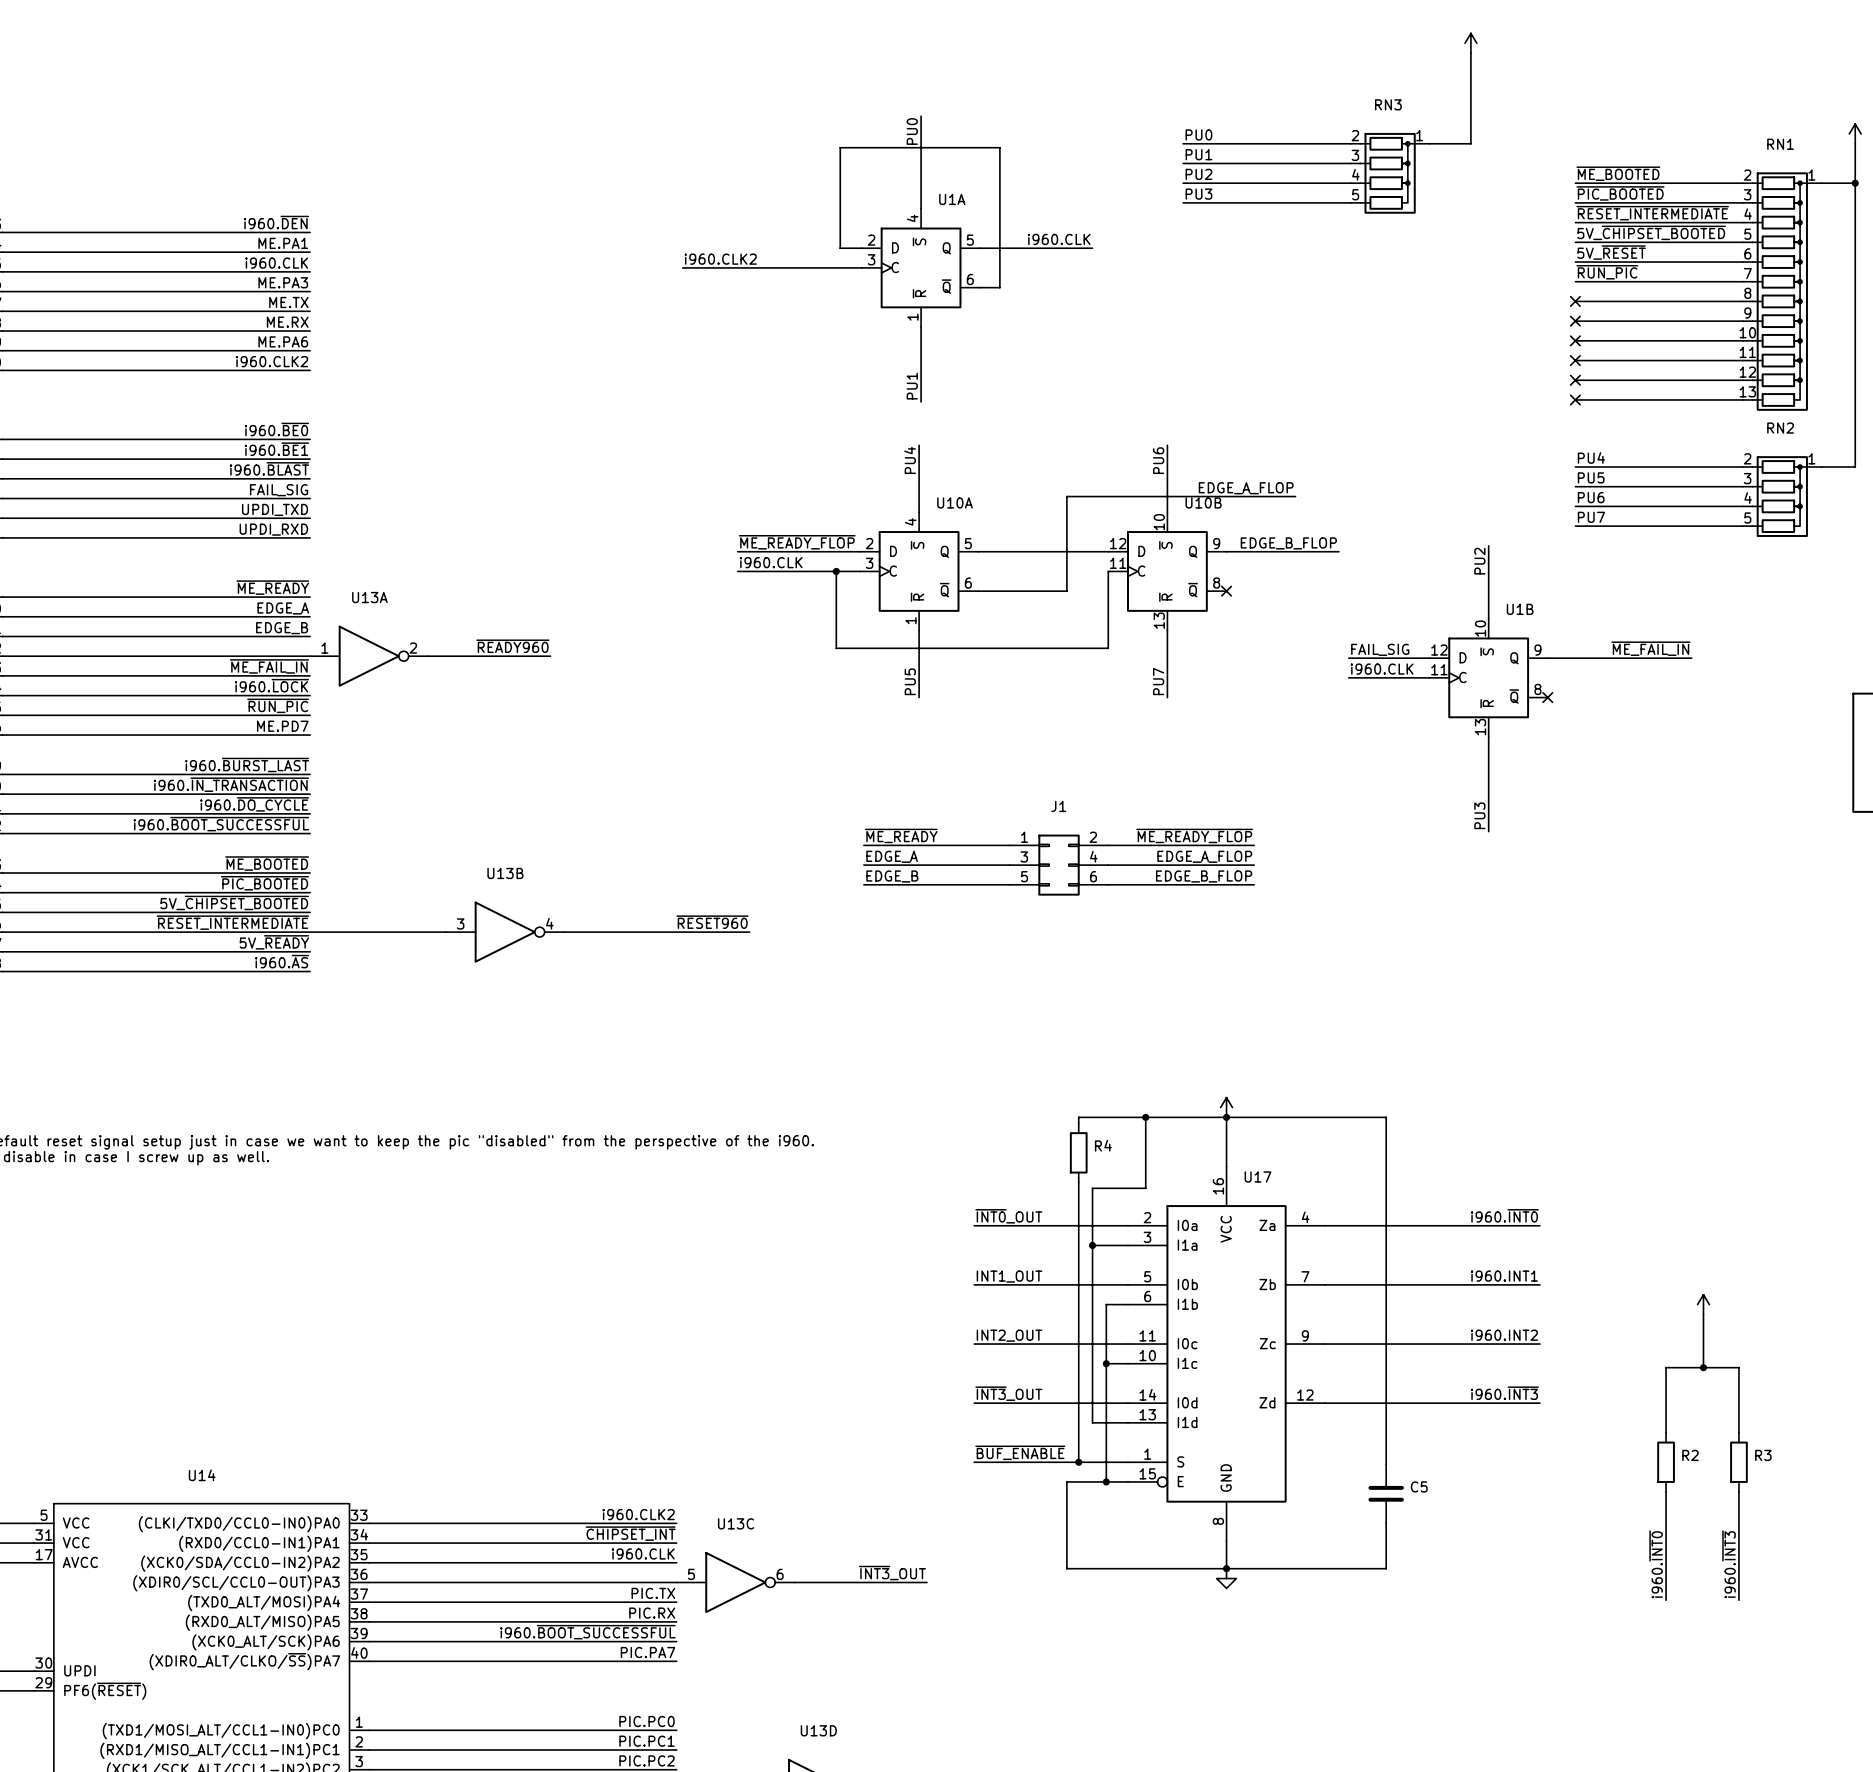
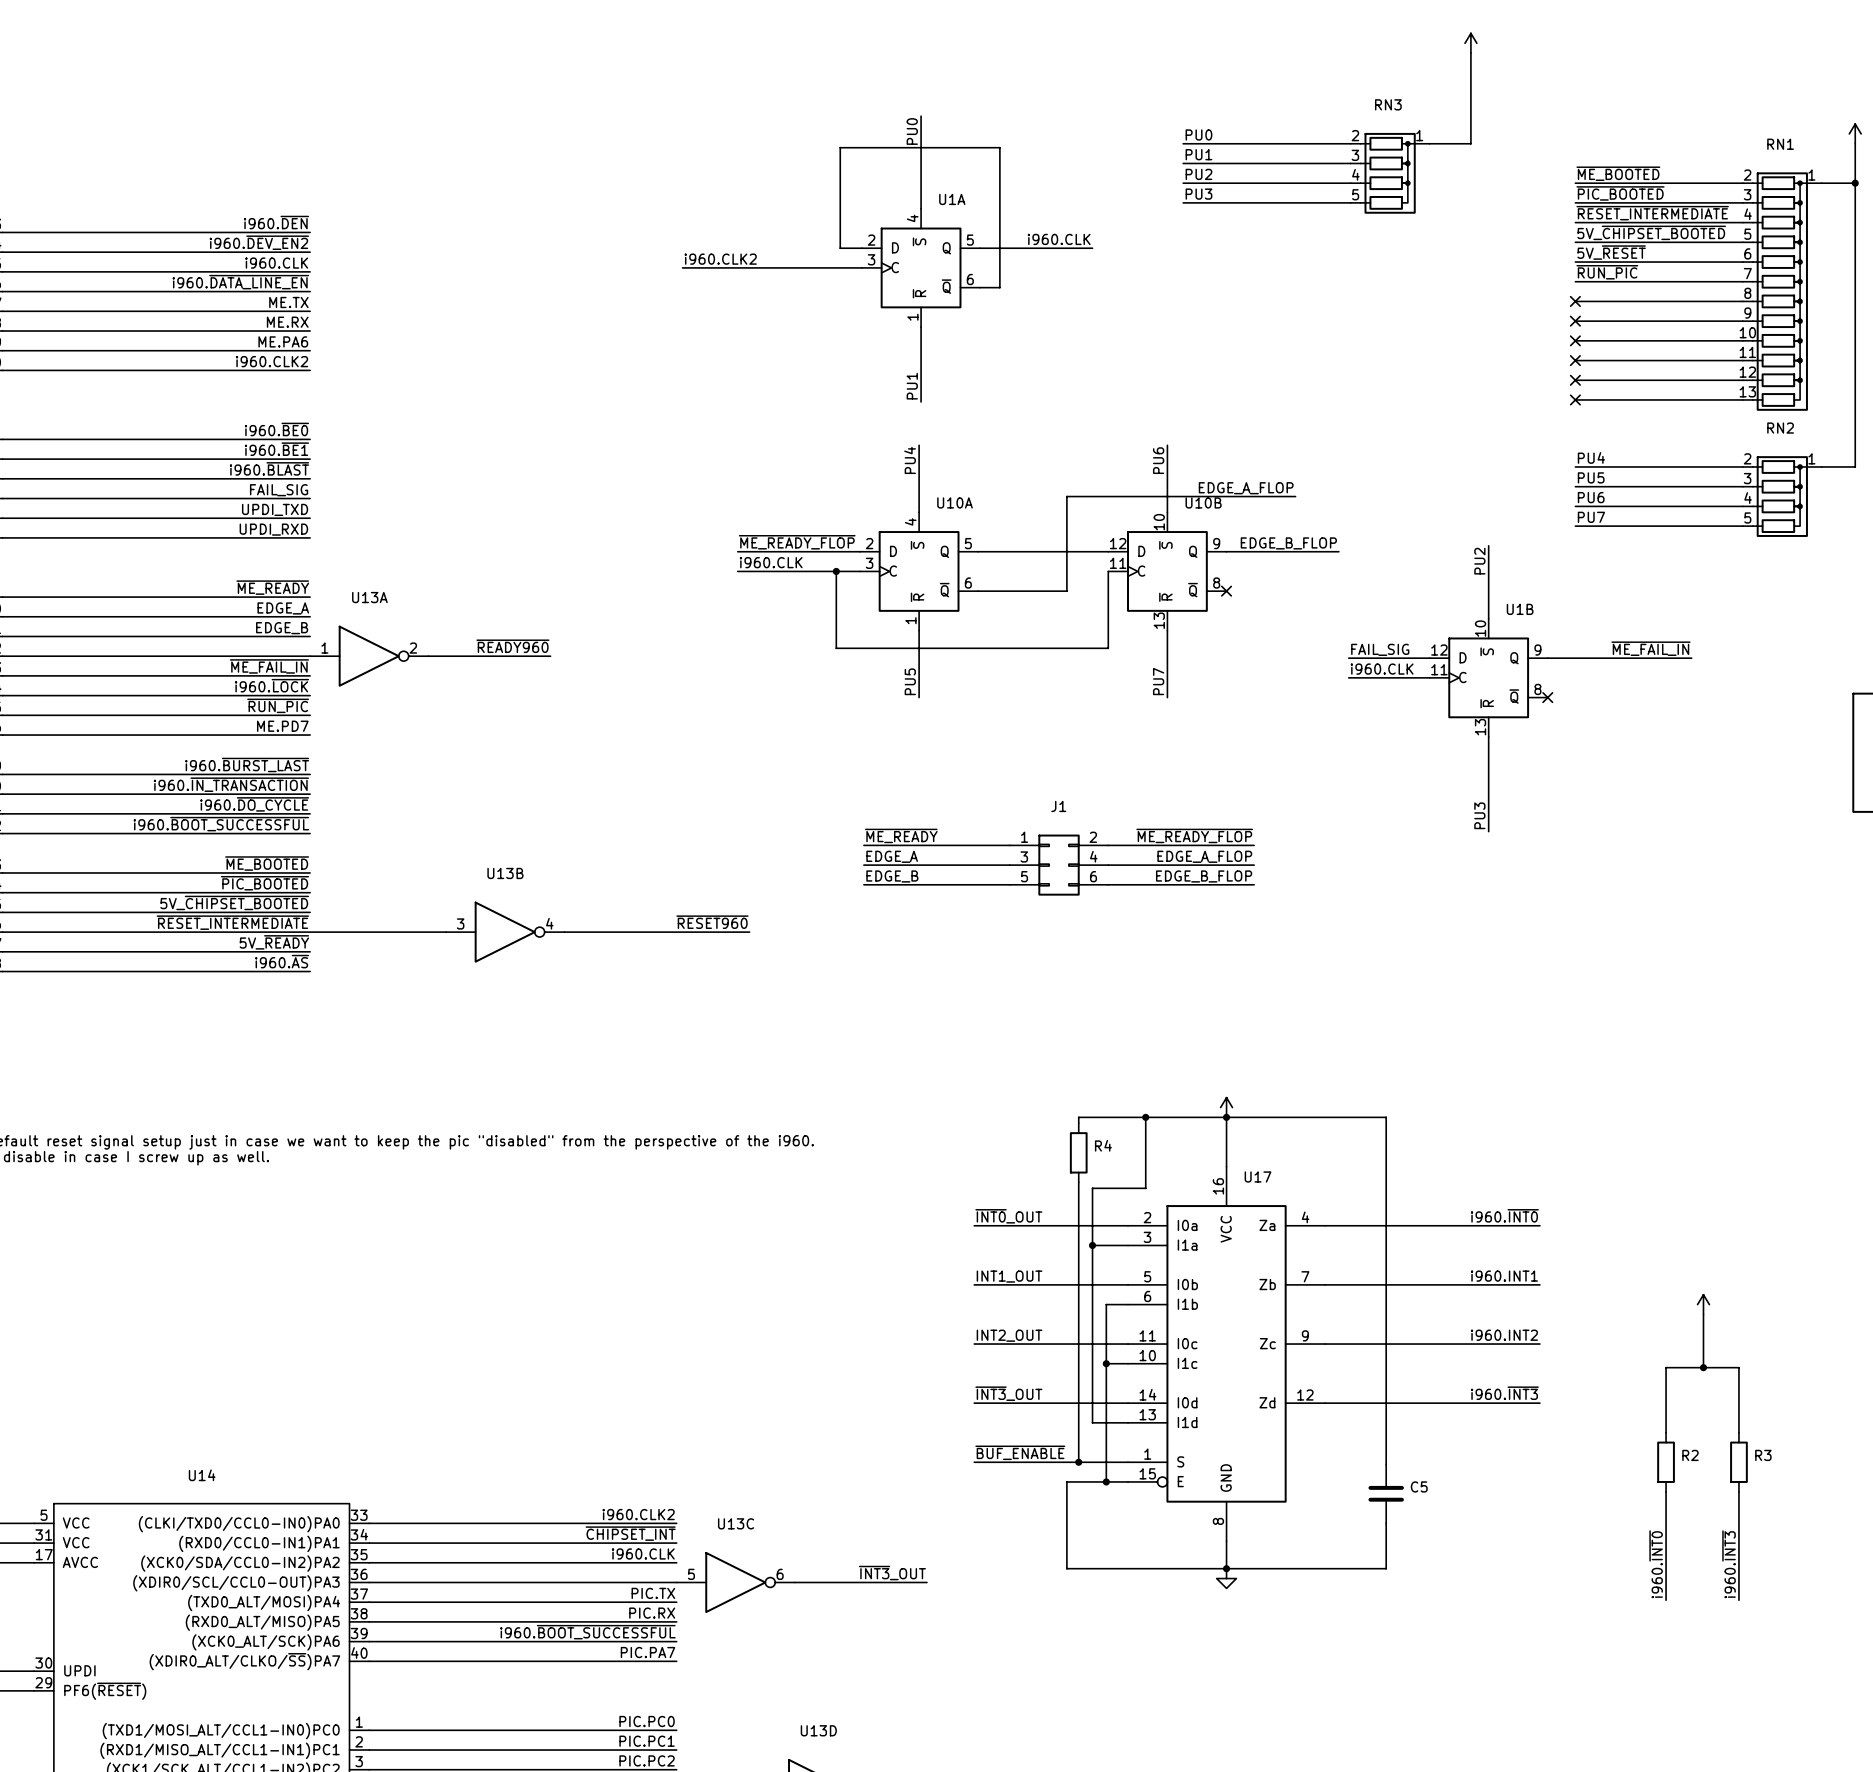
label: ME.PA1 (283, 243) -> i960.~{DEV_EN2} (259, 242)
label: ME.PA3 (283, 282) -> i960.~{DATA_LINE_EN} (240, 282)

